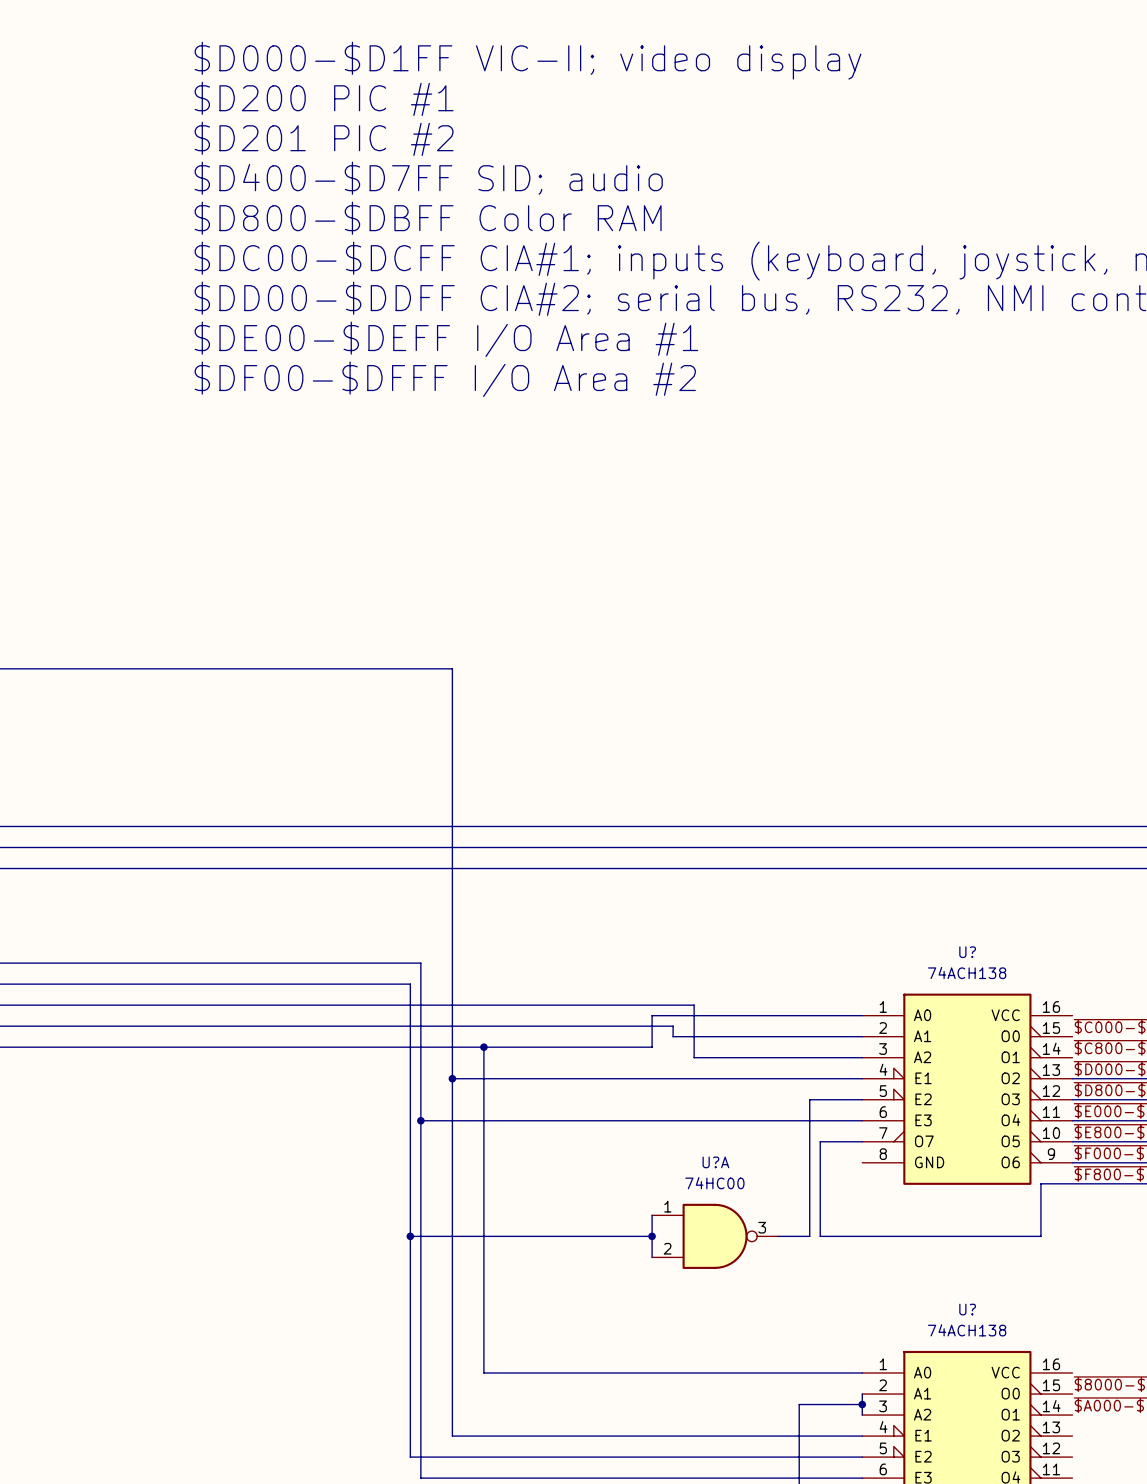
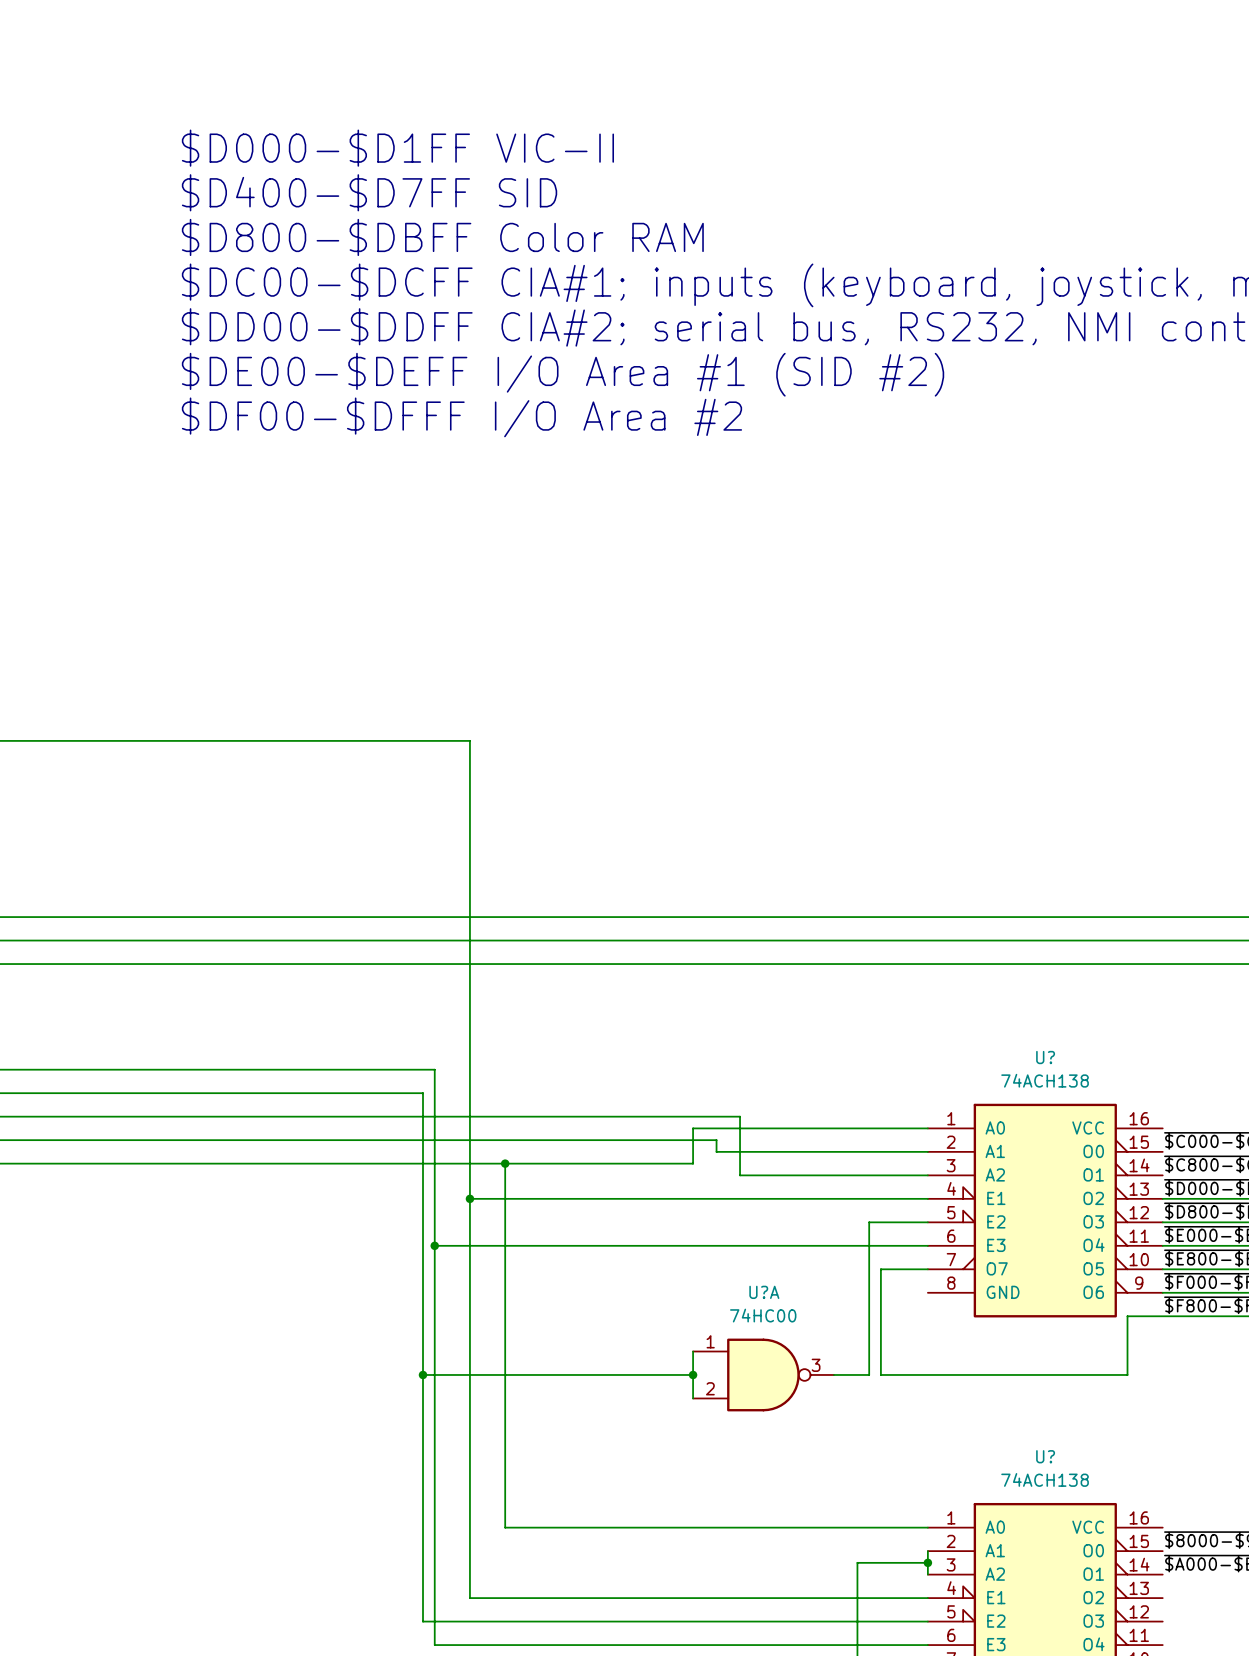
text: $D000-$D1FF VIC-II; video display (528, 60) -> none
text: $D200 PIC #1 (324, 98) -> none
text: $D201 PIC #2 (324, 138) -> $D000-$D1FF VIC-II (397, 148)
text: $D400-$D7FF SID; audio (428, 178) -> $D400-$D7FF SID (369, 192)
text: $DE00-$DEFF I/O Area #1 (446, 339) -> $DE00-$DEFF I/O Area #1 (SID #2) (563, 374)

